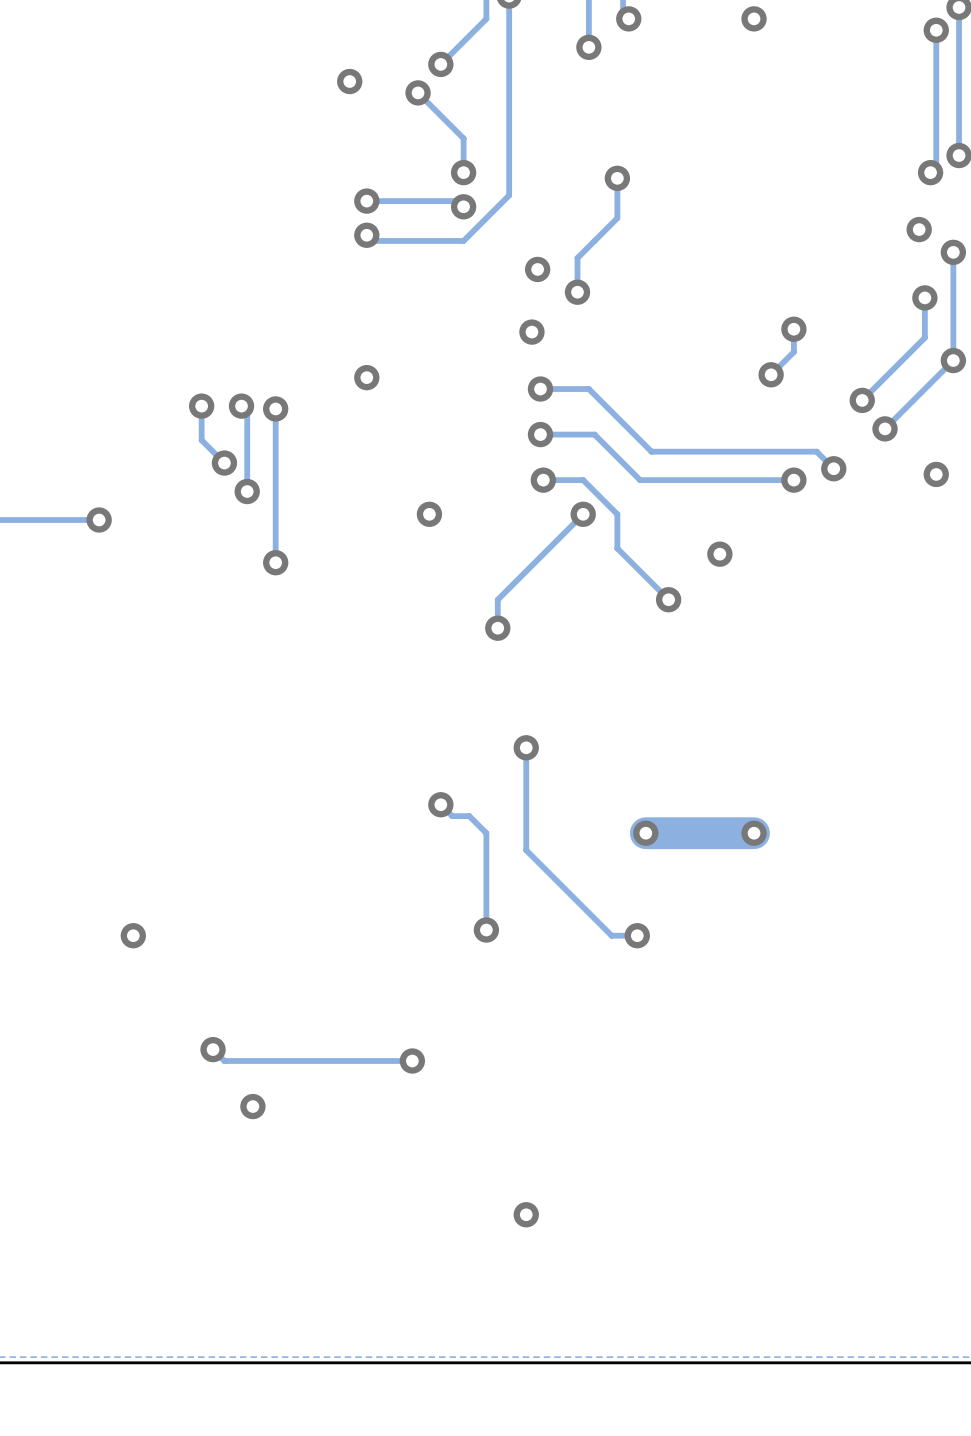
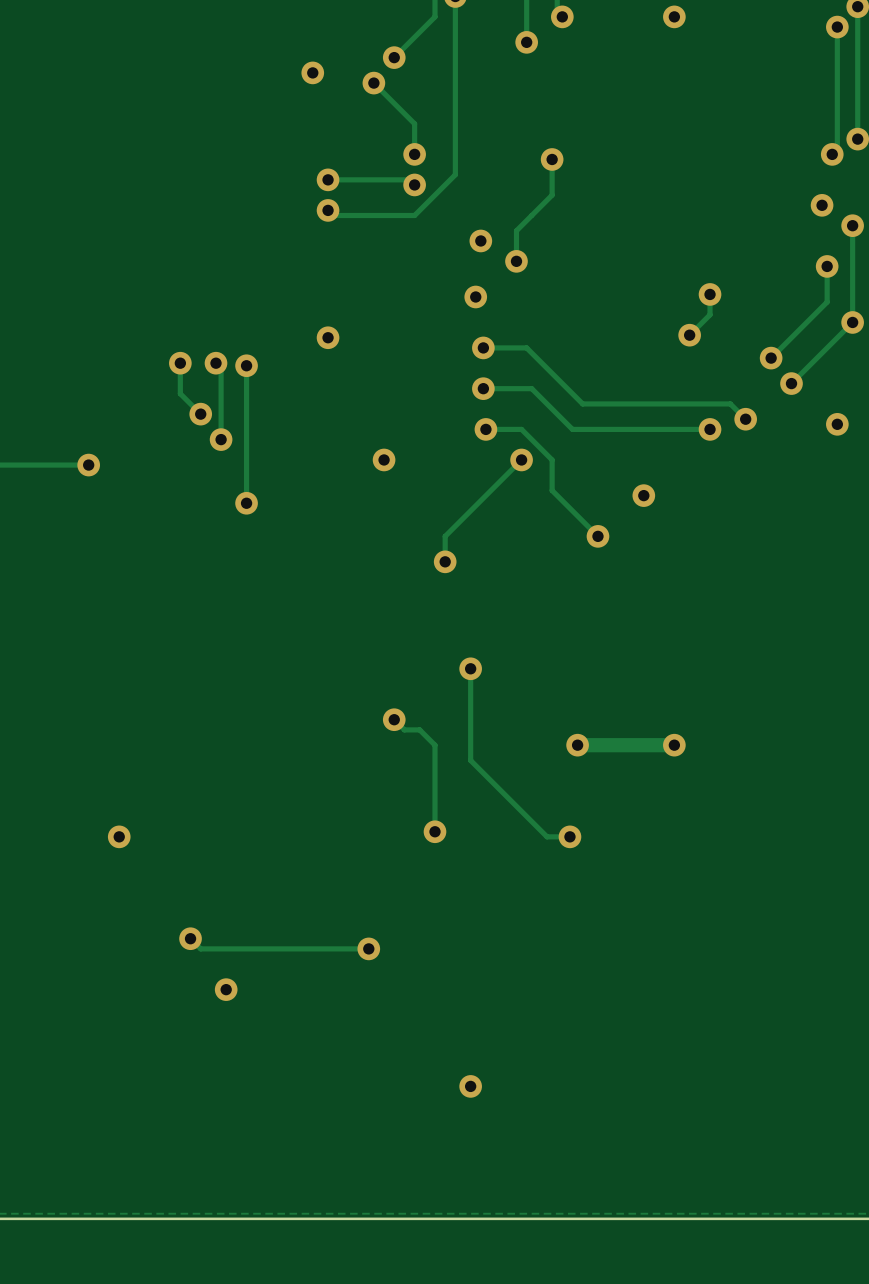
track width: thick (754, 833) (645, 833) -> thin (674, 745) (577, 745)

